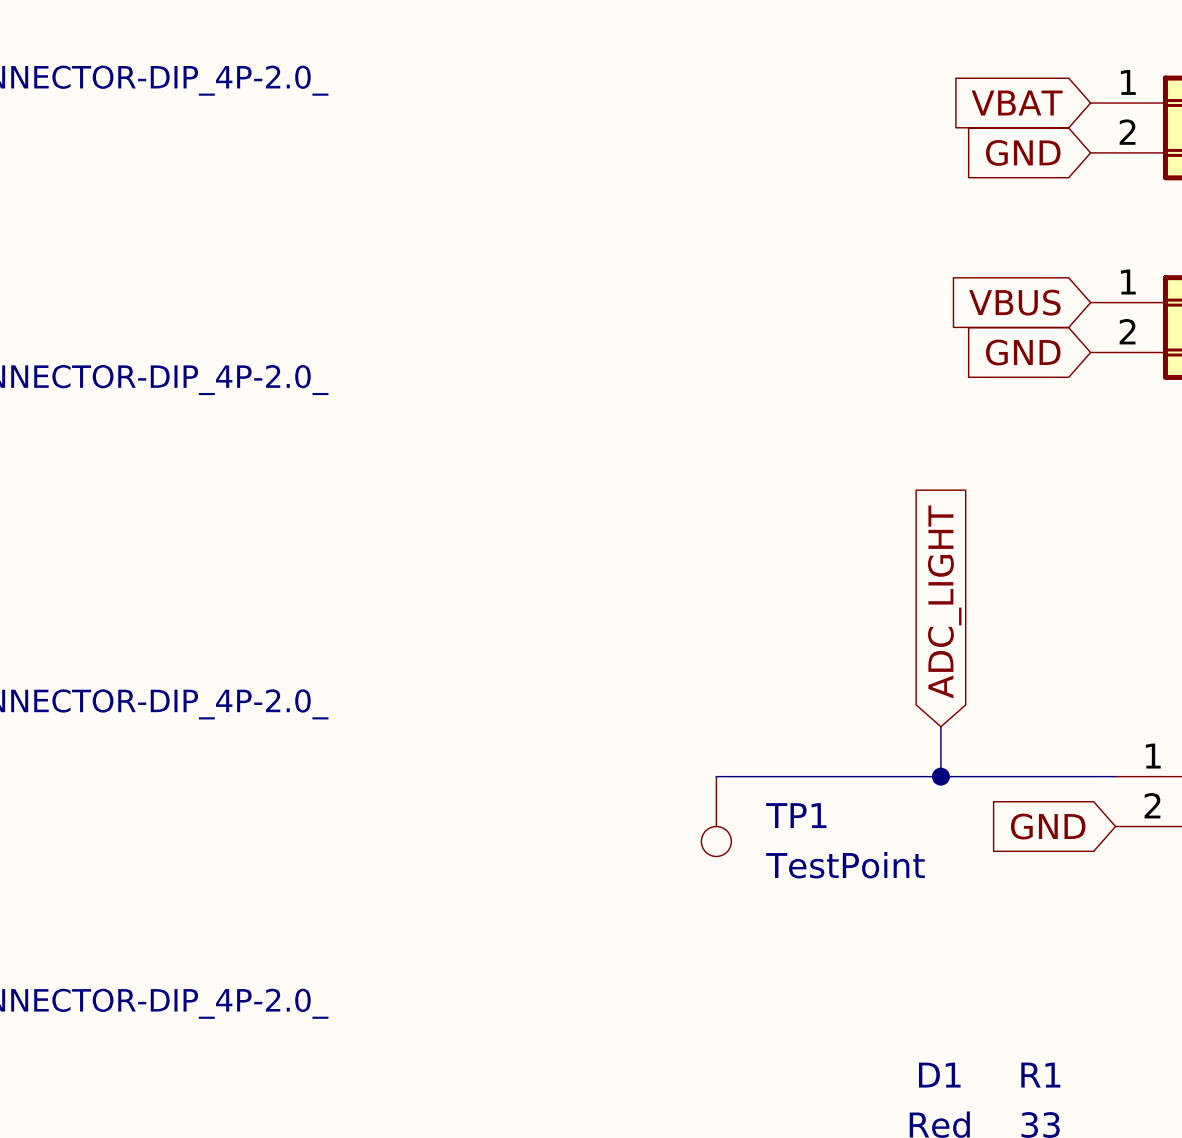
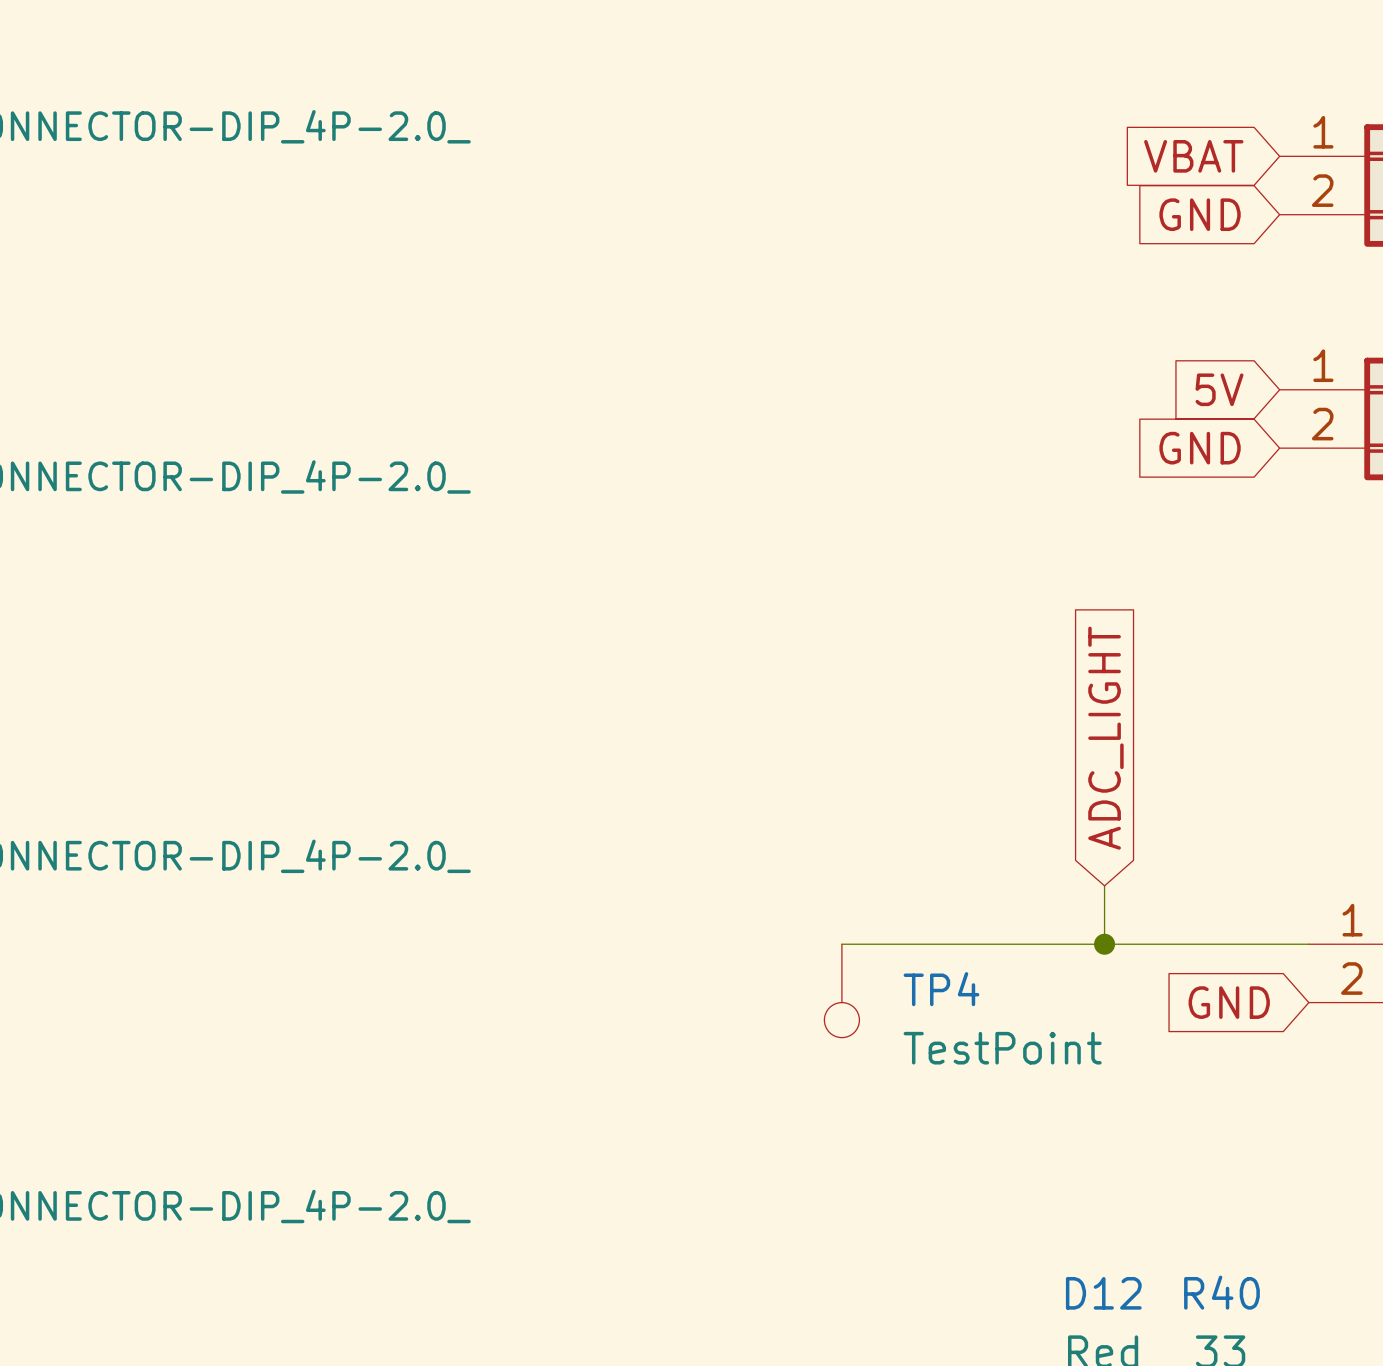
global label: VBUS (1014, 302) -> 5V (1219, 389)
TP1 name: TP1 (796, 815) -> TP4 (941, 989)
D1 name: D1 (939, 1075) -> D12 (1103, 1293)
R1 name: R1 (1040, 1075) -> R40 (1221, 1292)

